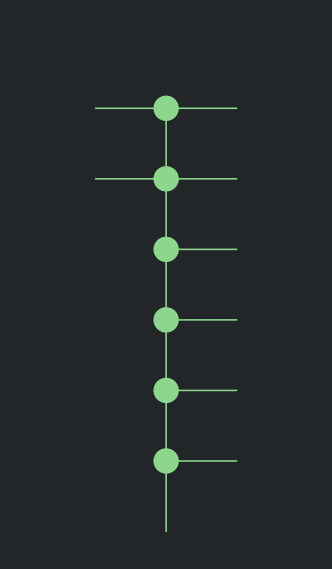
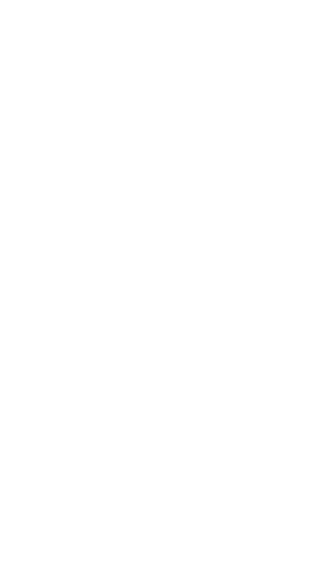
wire: (95, 108) (236, 108) -> none
wire: (166, 108) (166, 531) -> none
junction: (166, 108) -> none
wire: (95, 178) (236, 178) -> none
junction: (166, 178) -> none
wire: (166, 249) (236, 249) -> none
junction: (166, 249) -> none
wire: (166, 319) (236, 319) -> none
junction: (166, 319) -> none
wire: (166, 390) (236, 390) -> none
junction: (166, 390) -> none
wire: (166, 460) (236, 460) -> none
junction: (166, 460) -> none

